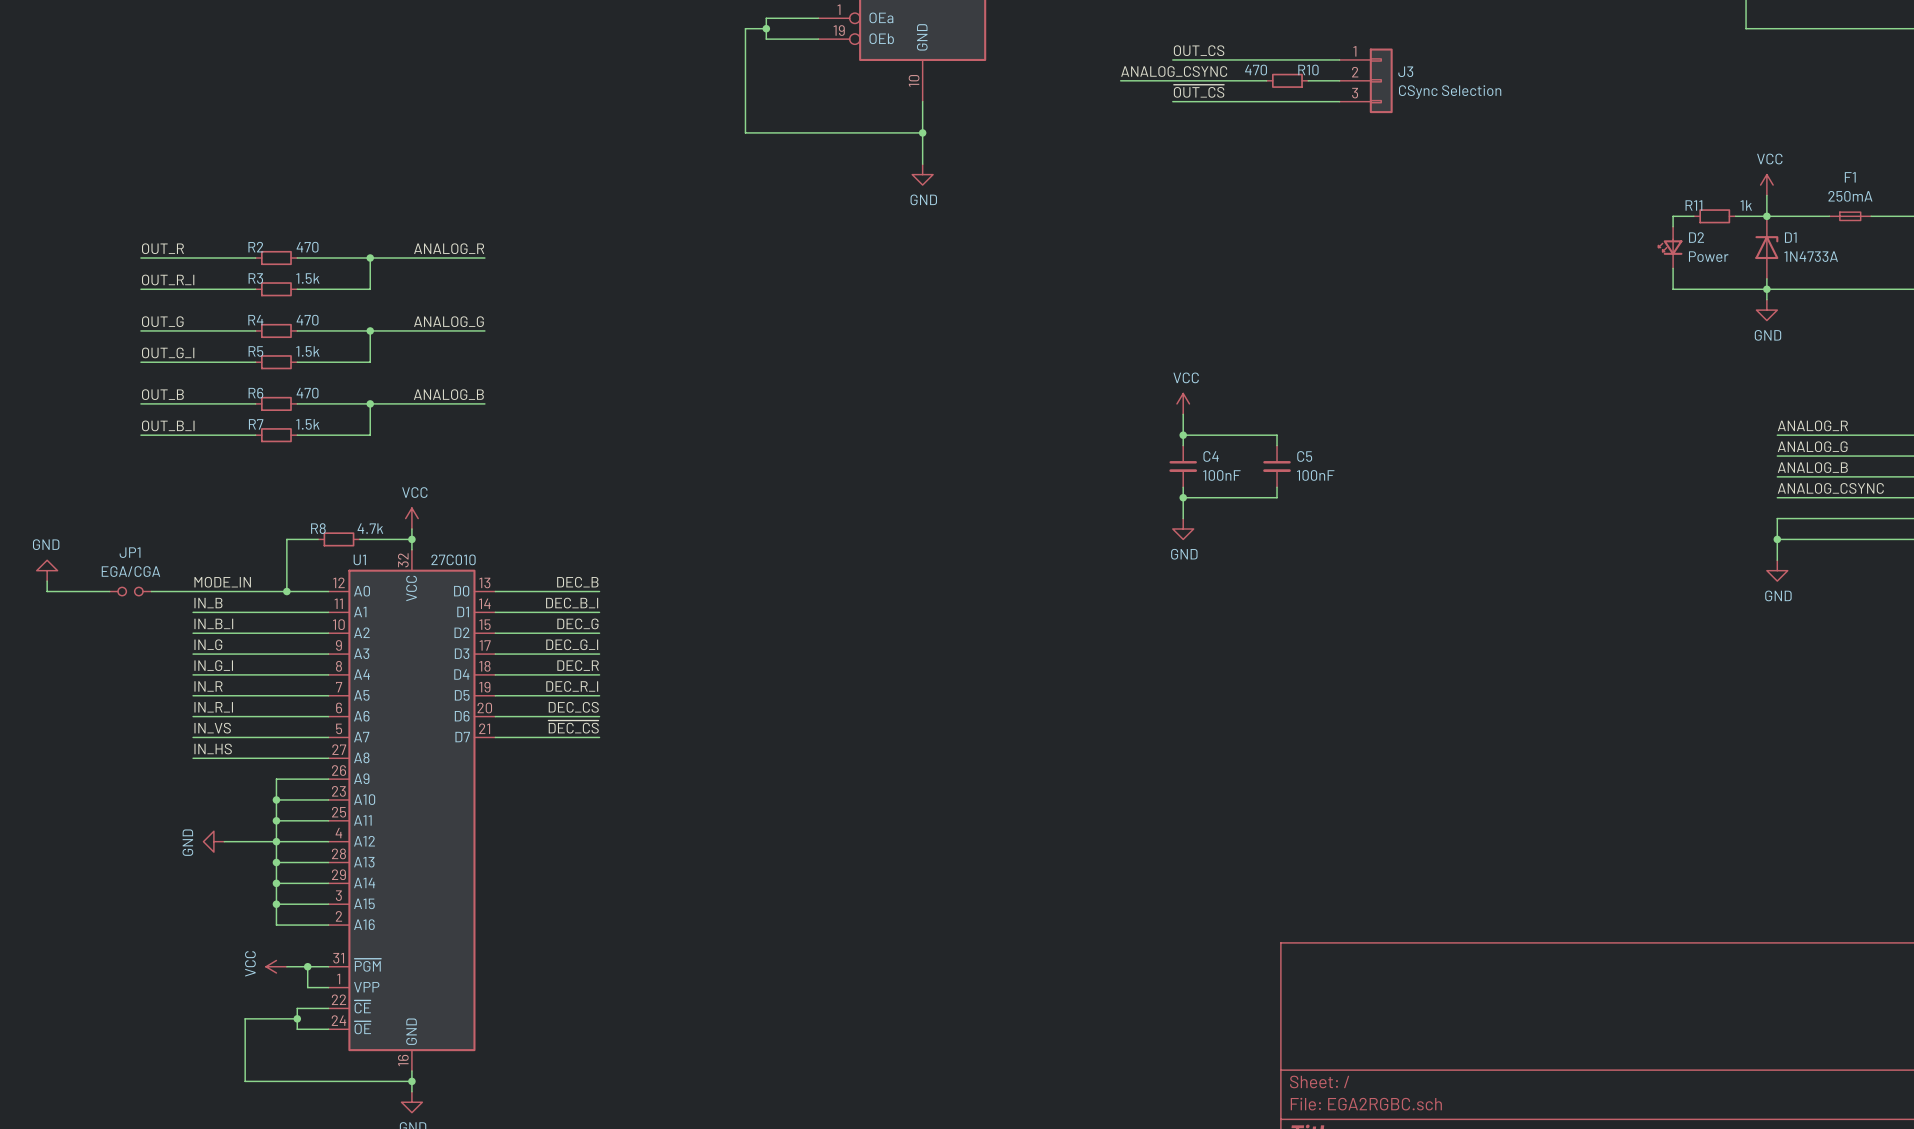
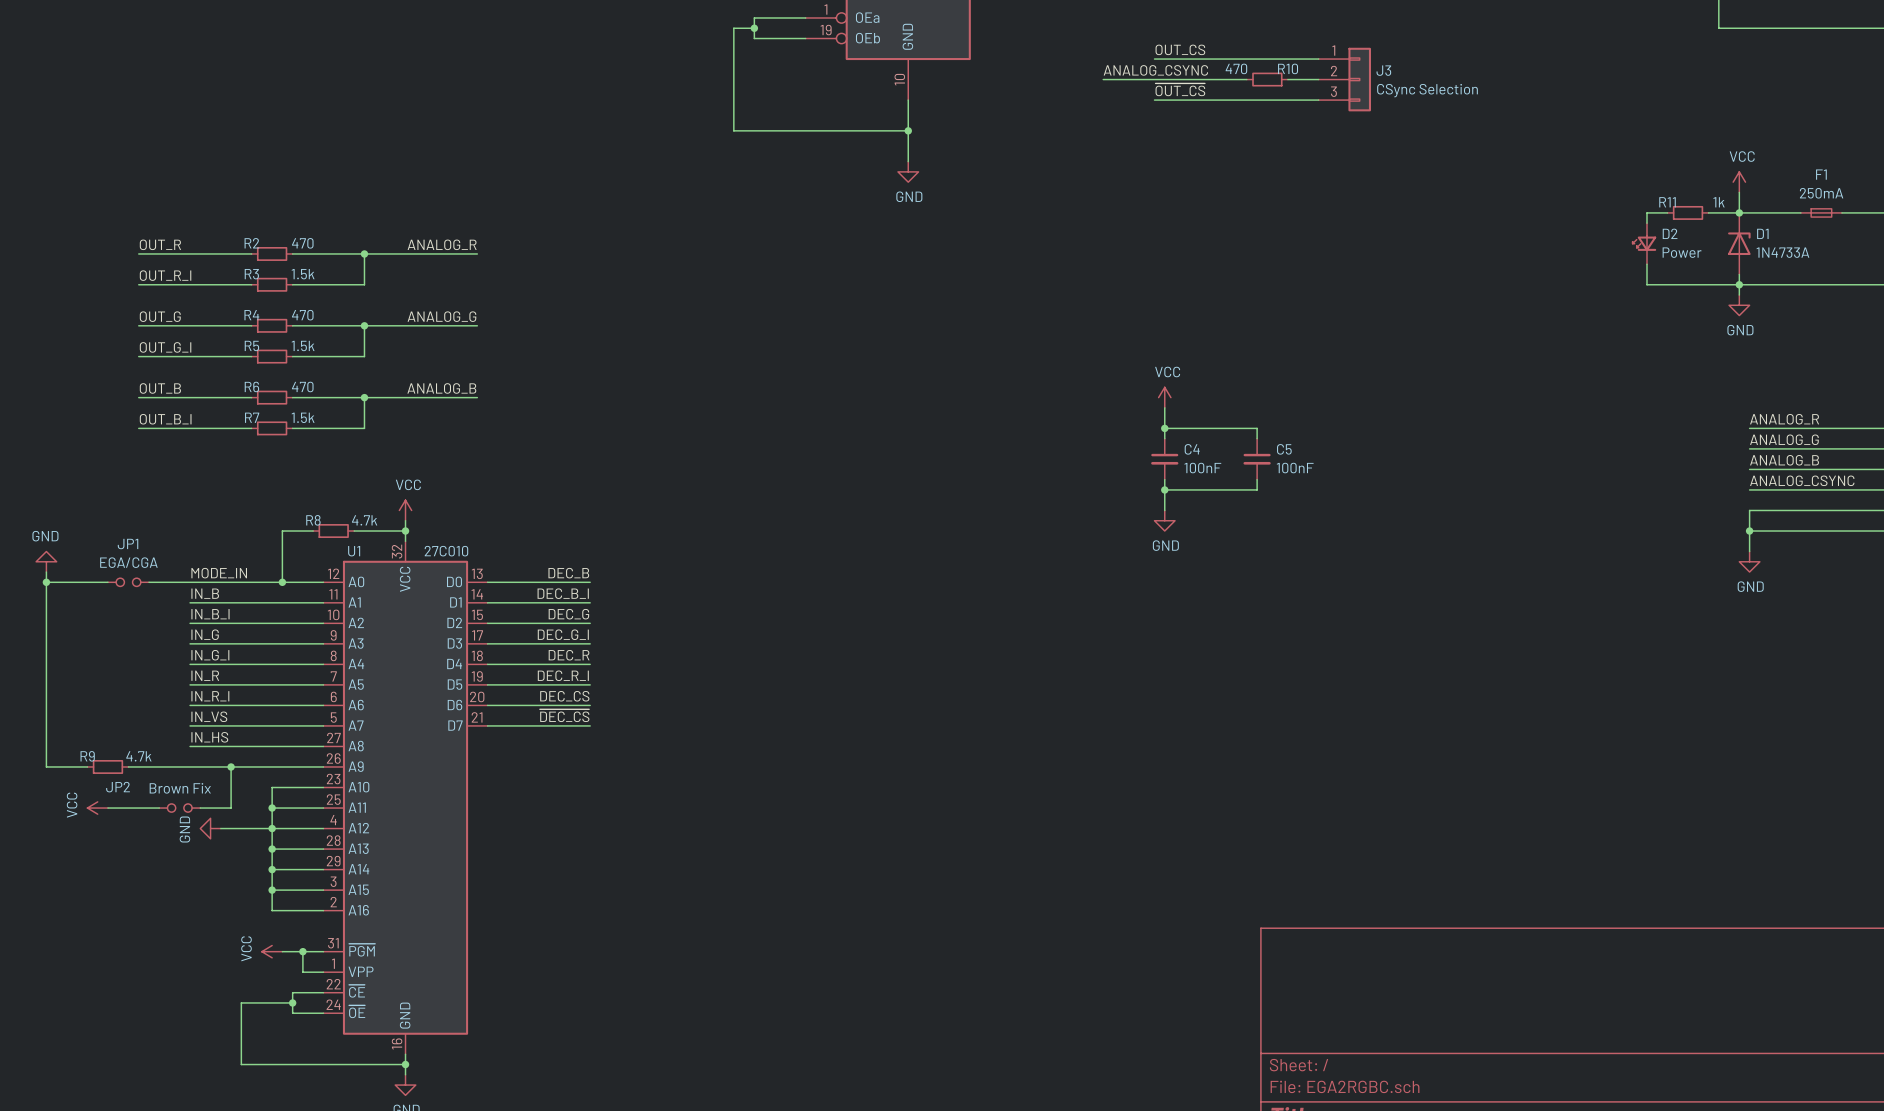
wire: none -> (46, 582) (46, 766) (87, 766)
junction: none -> (46, 582)
R9: none -> 4.7k (107, 766)
wire: none -> (231, 766) (231, 808) (200, 808)
wire: (276, 779) (276, 799) -> (272, 766) (128, 766)
junction position: (276, 799) -> (231, 766)
power symbol: none -> VCC (97, 808)
wire: none -> (107, 808) (159, 808)
JP2: none -> Brown Fix (179, 808)

